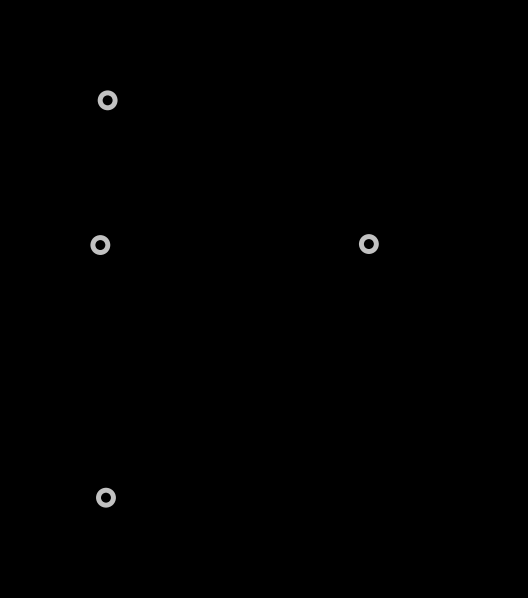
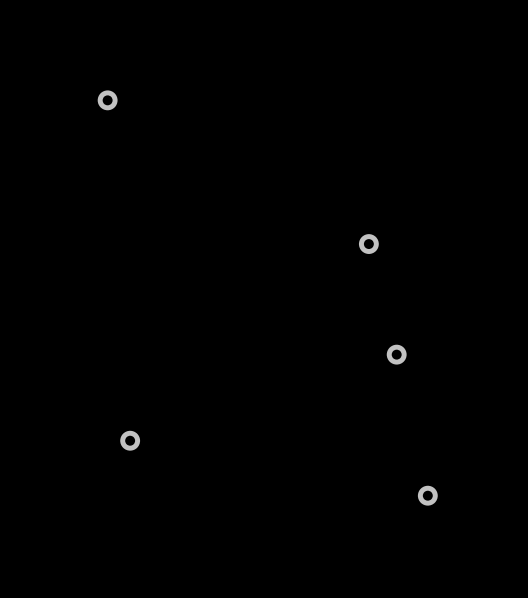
via: (100, 245) -> none
via: none -> (396, 354)
via: none -> (427, 495)
via position: (105, 497) -> (130, 440)

